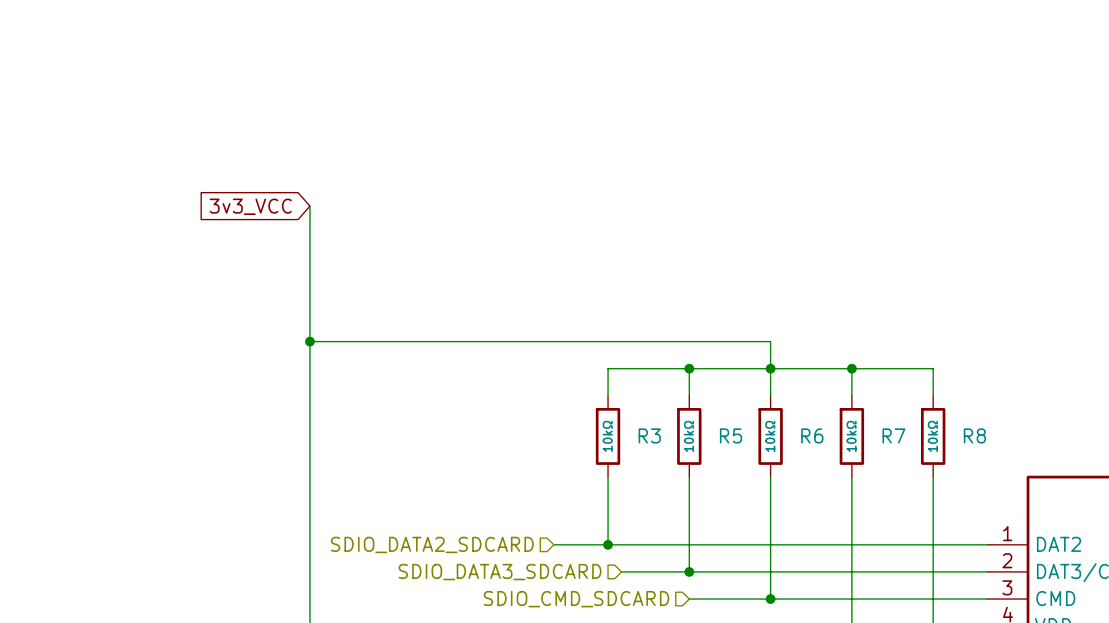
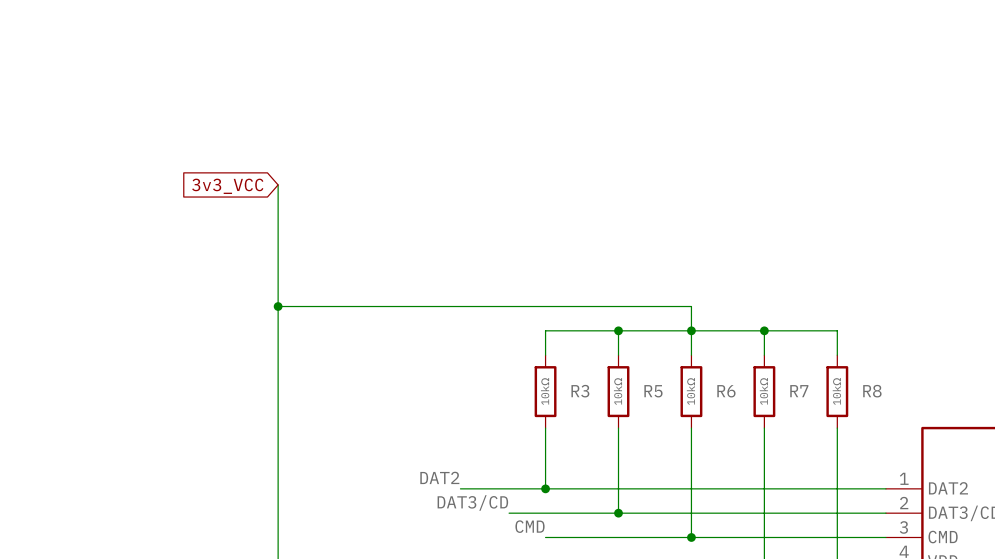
label: none -> DAT2 (439, 477)
hierarchical label: SDIO_DATA2_SDCARD (432, 544) -> none
wire: none -> (460, 488) (496, 488)
label: none -> DAT3/CD (472, 502)
wire: none -> (509, 513) (557, 513)
hierarchical label: SDIO_DATA3_SDCARD (500, 572) -> none
label: none -> CMD (530, 526)
hierarchical label: SDIO_CMD_SDCARD (576, 599) -> none
wire: none -> (545, 537) (618, 537)

